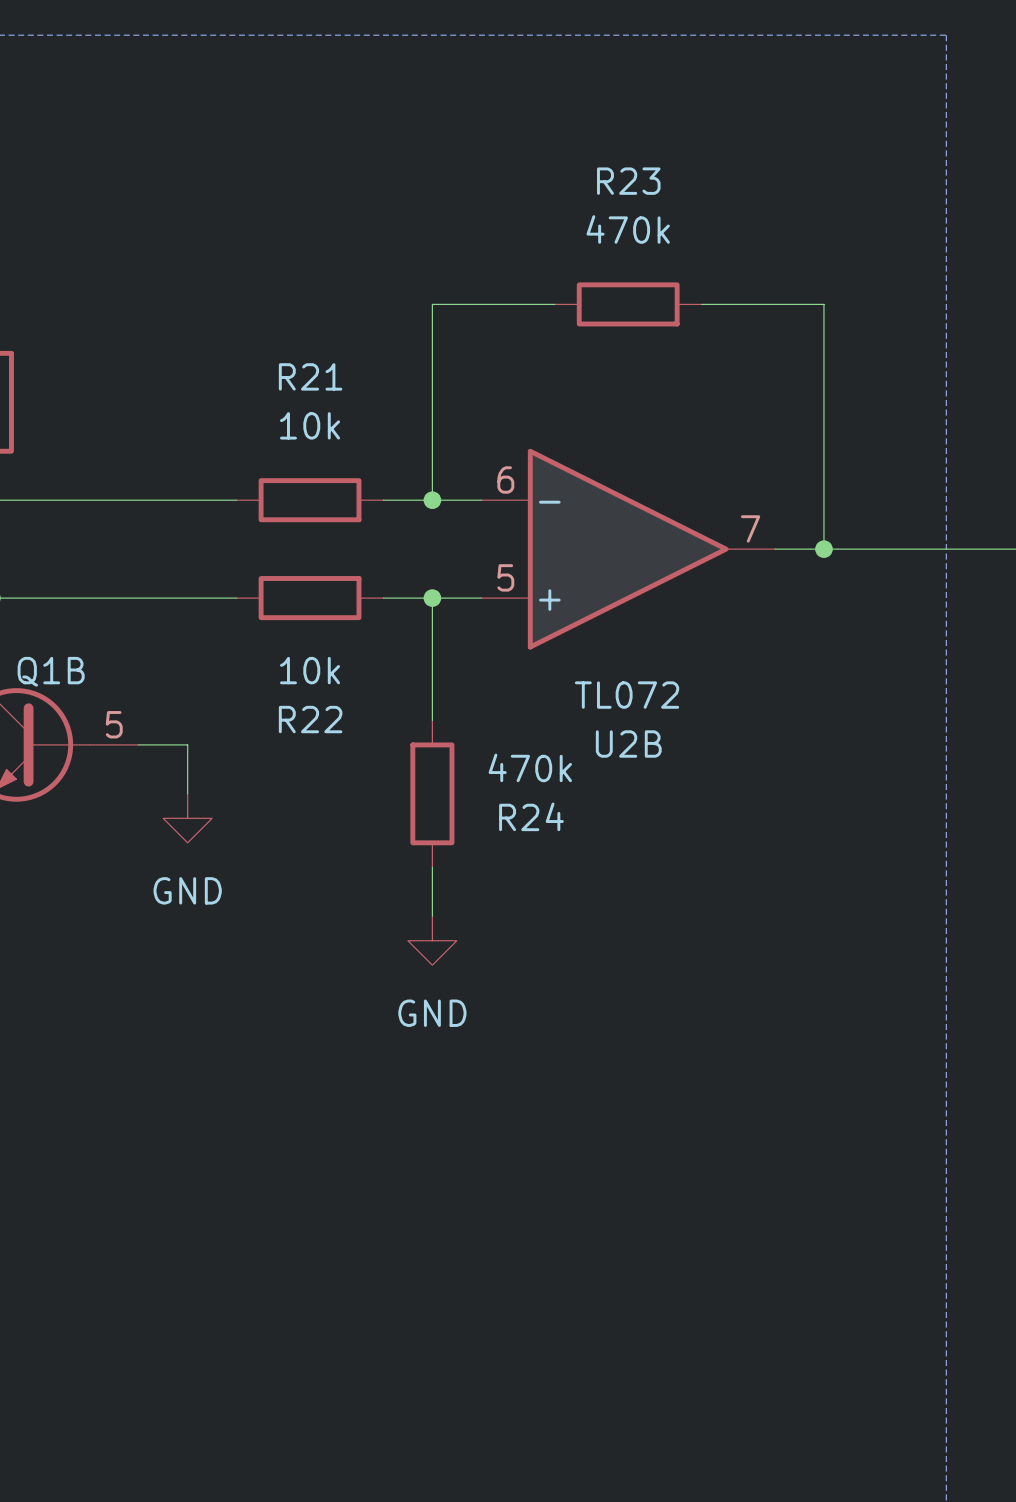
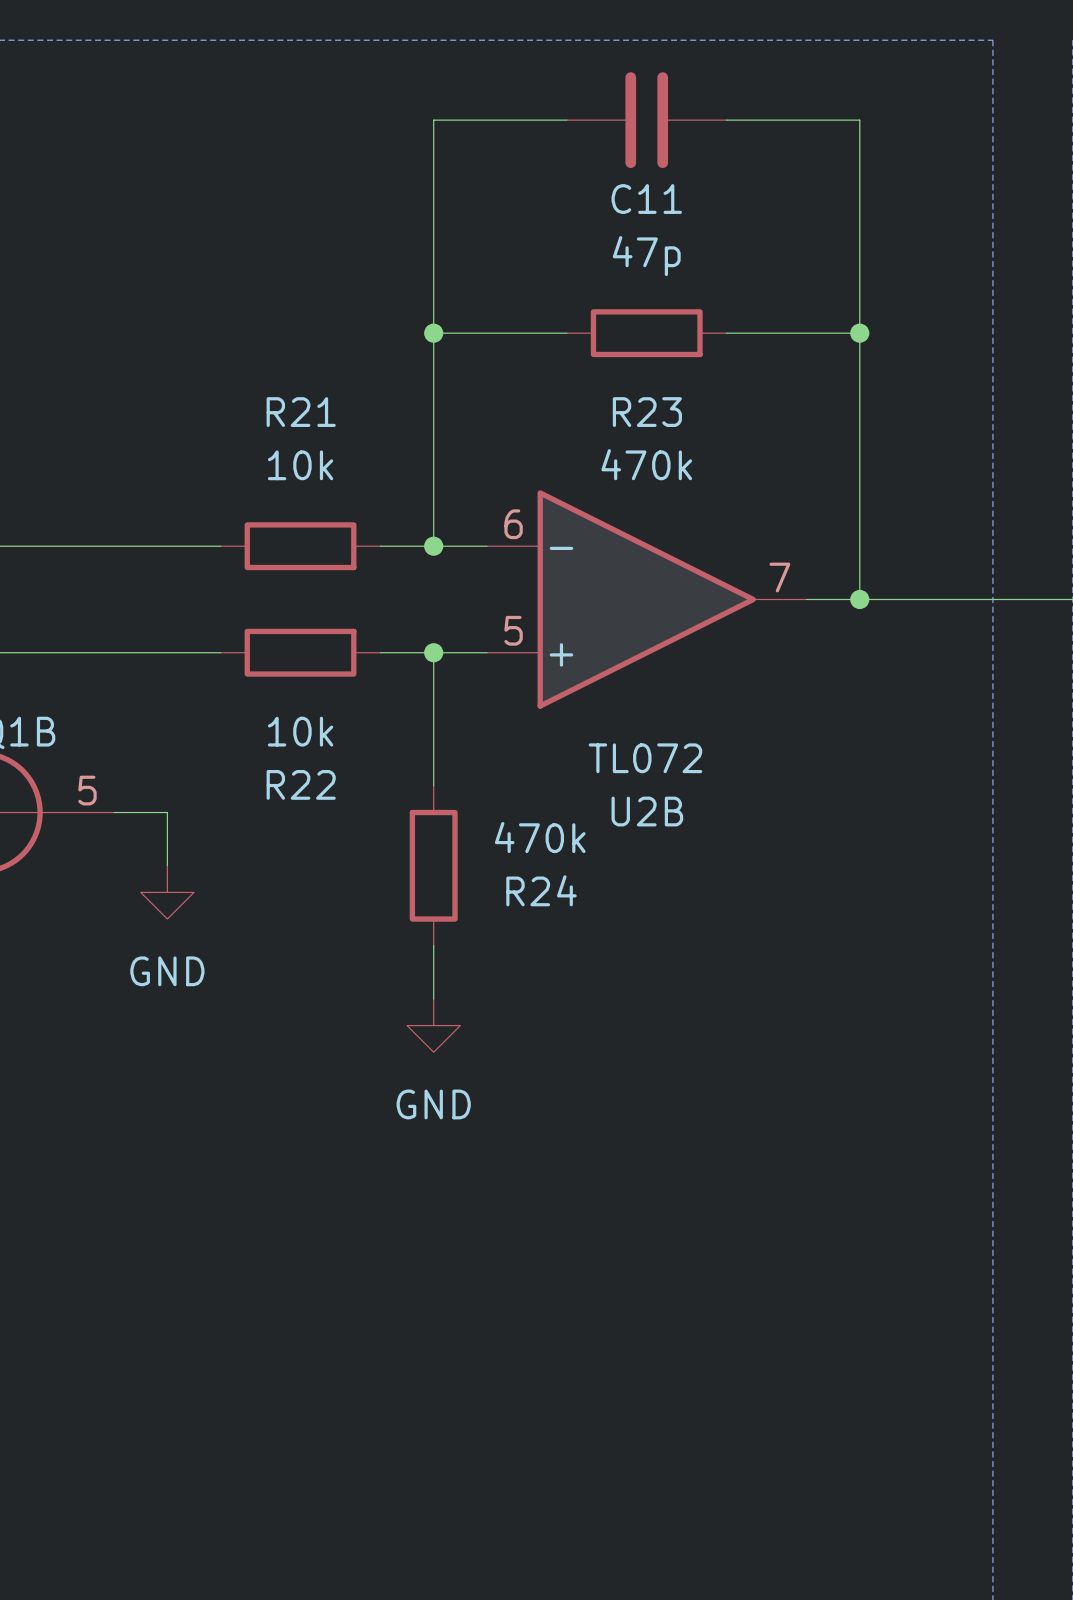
wire: none -> (566, 120) (433, 120) (433, 333)
C11: none -> 47p (646, 120)
wire: none -> (726, 120) (859, 120) (859, 333)
R23 name position: R23 (628, 181) -> R23 (647, 412)
R23 value position: 470k (628, 229) -> 470k (646, 464)
junction: none -> (433, 333)
junction: none -> (859, 333)

